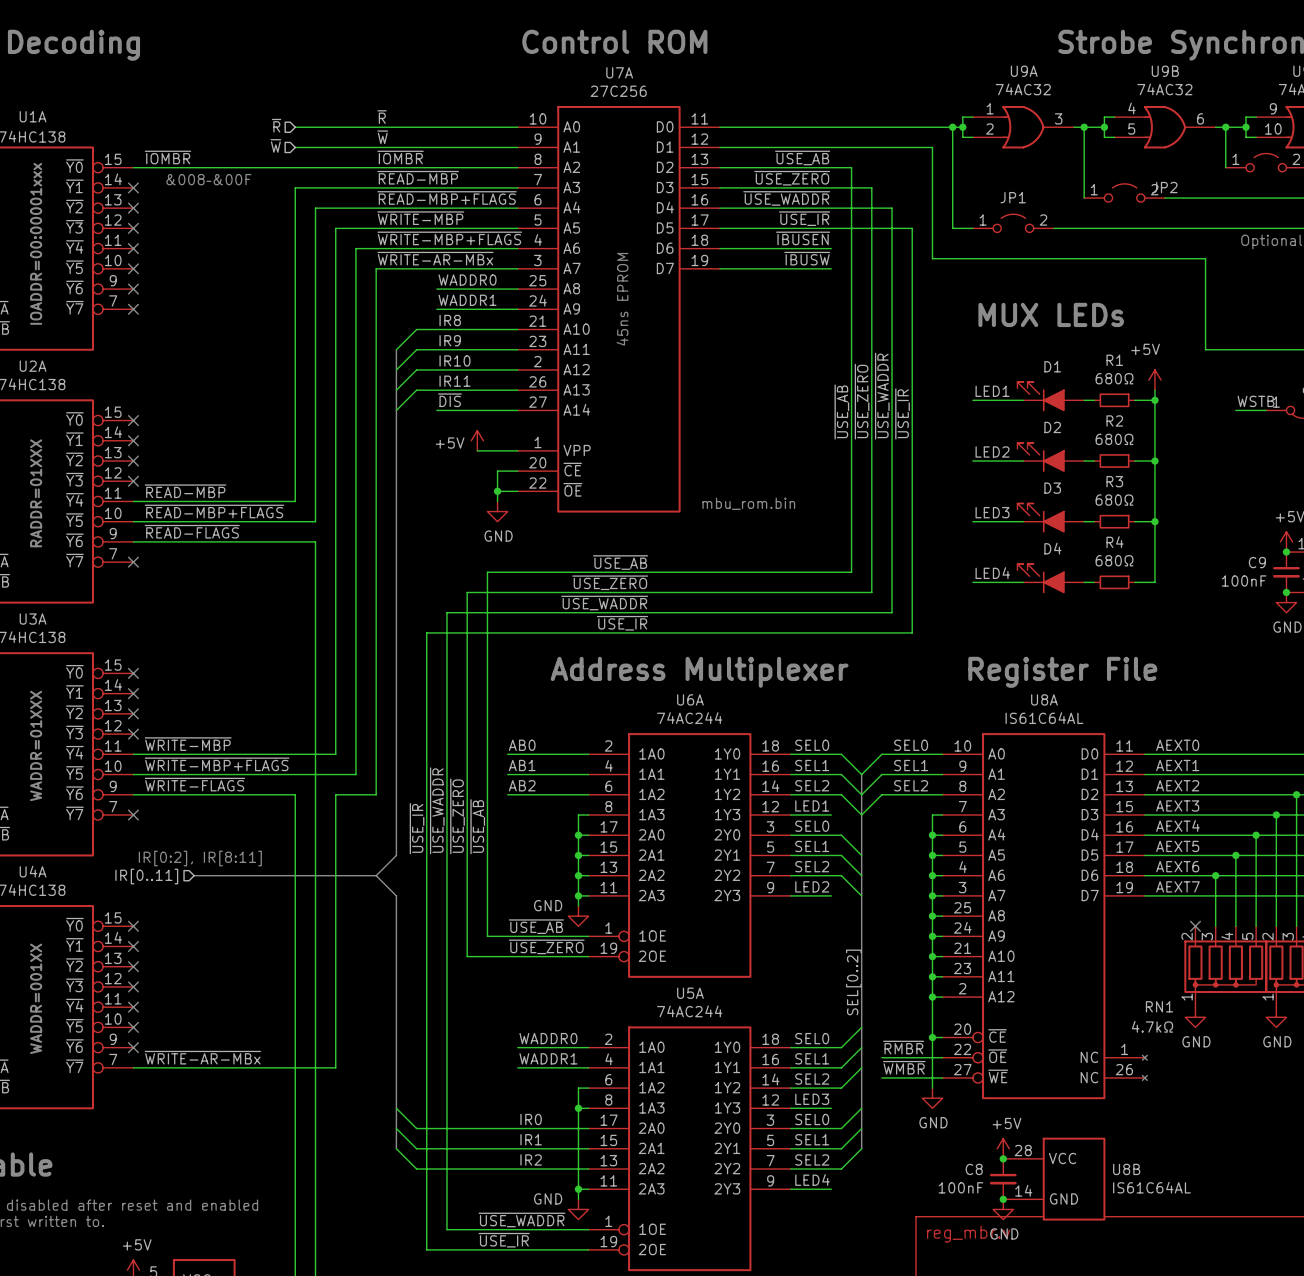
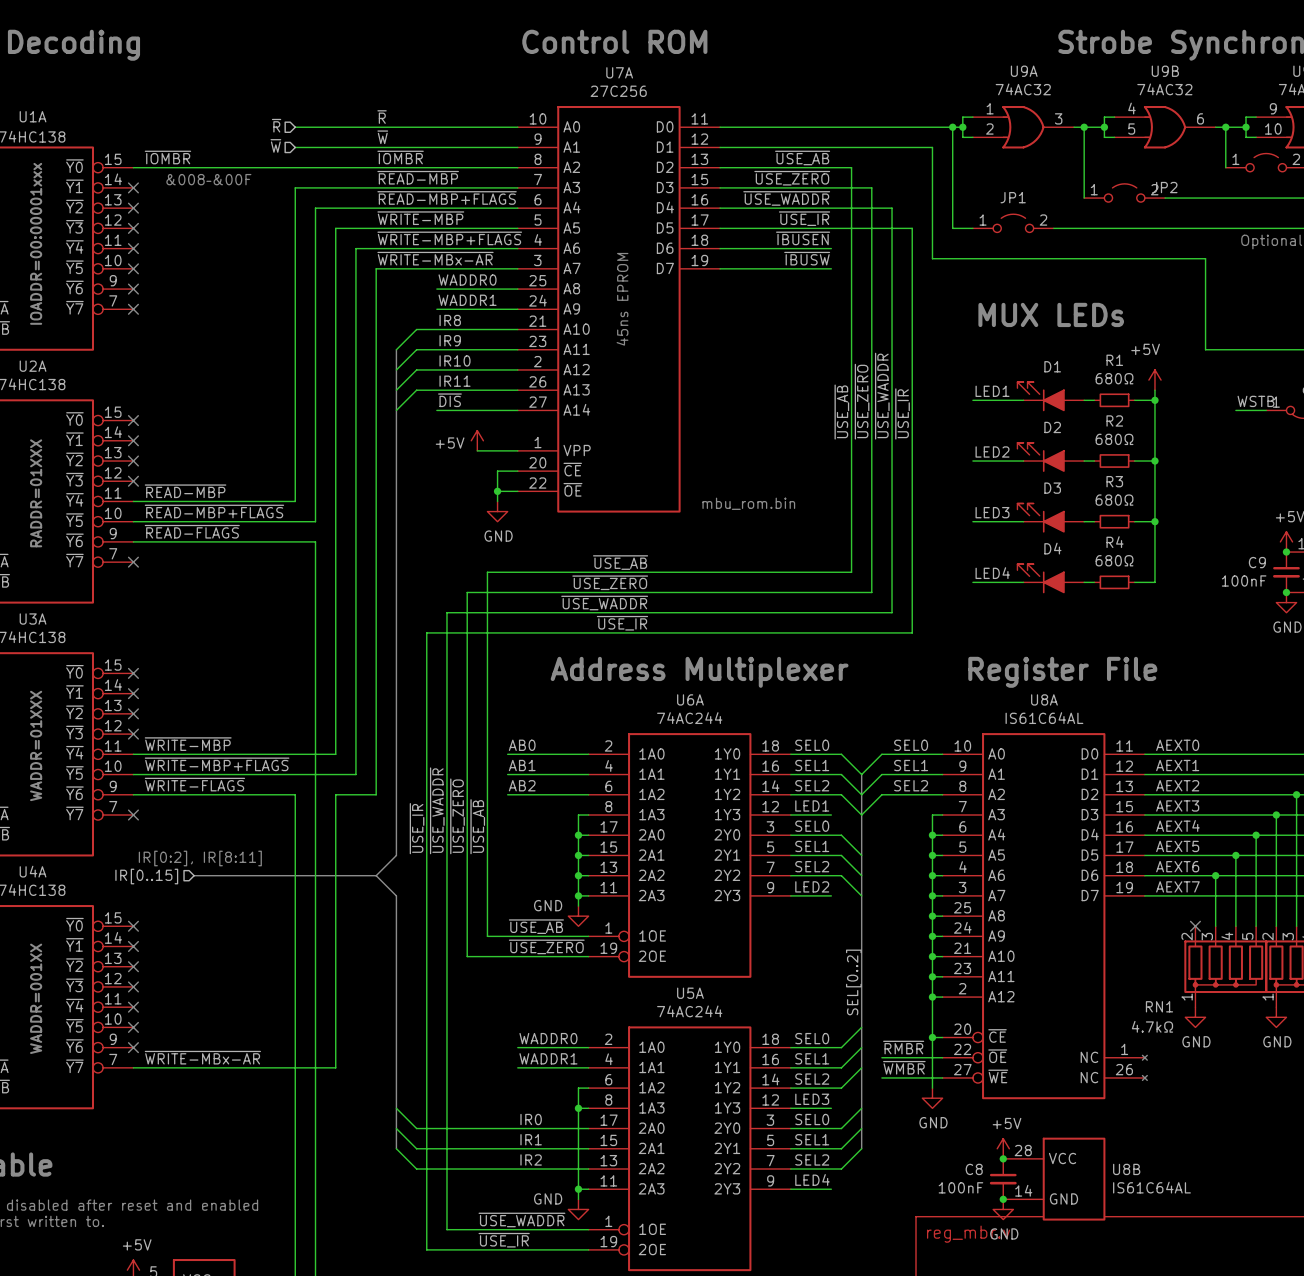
label: ~{WRITE-AR-MBx} (435, 258) -> ~{WRITE-MBx-AR} (435, 258)
hierarchical label: IR[0..11] (146, 876) -> IR[0..15] (146, 876)
label: ~{WRITE-AR-MBx} (202, 1057) -> ~{WRITE-MBx-AR} (202, 1057)

